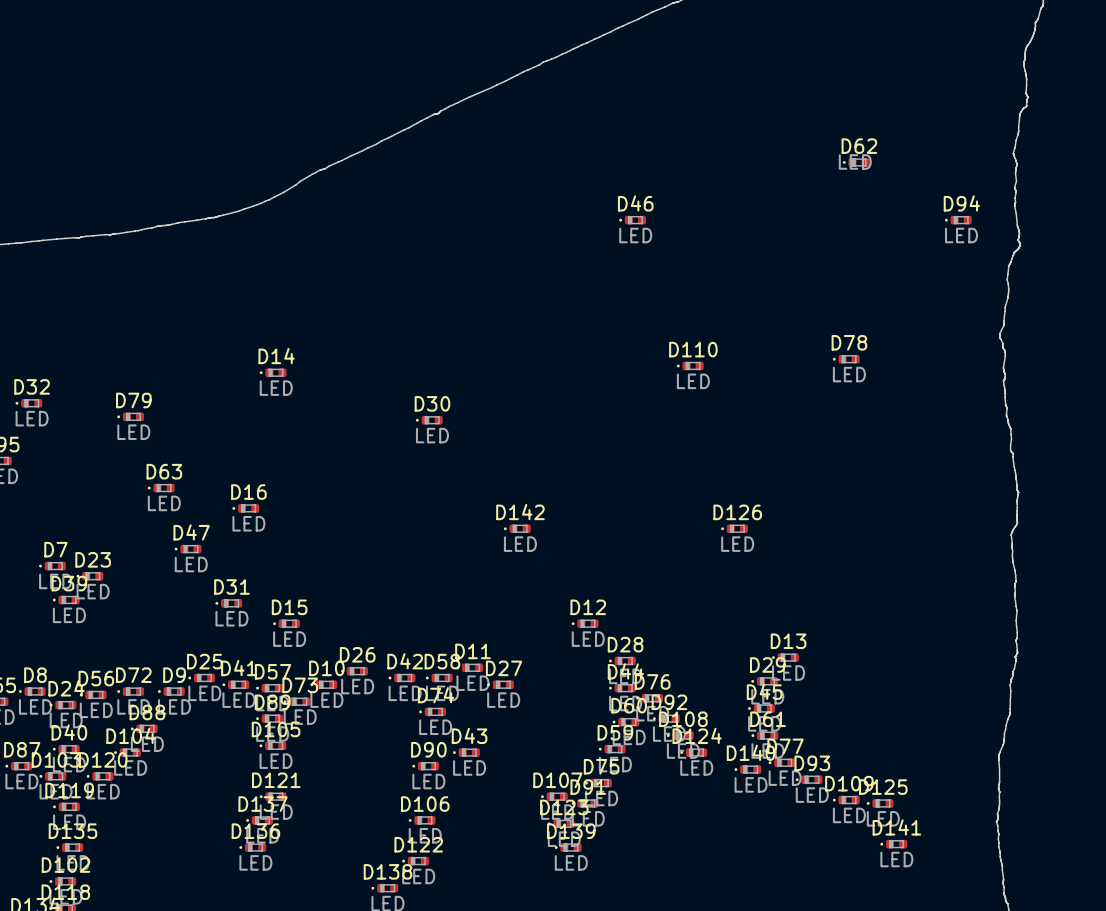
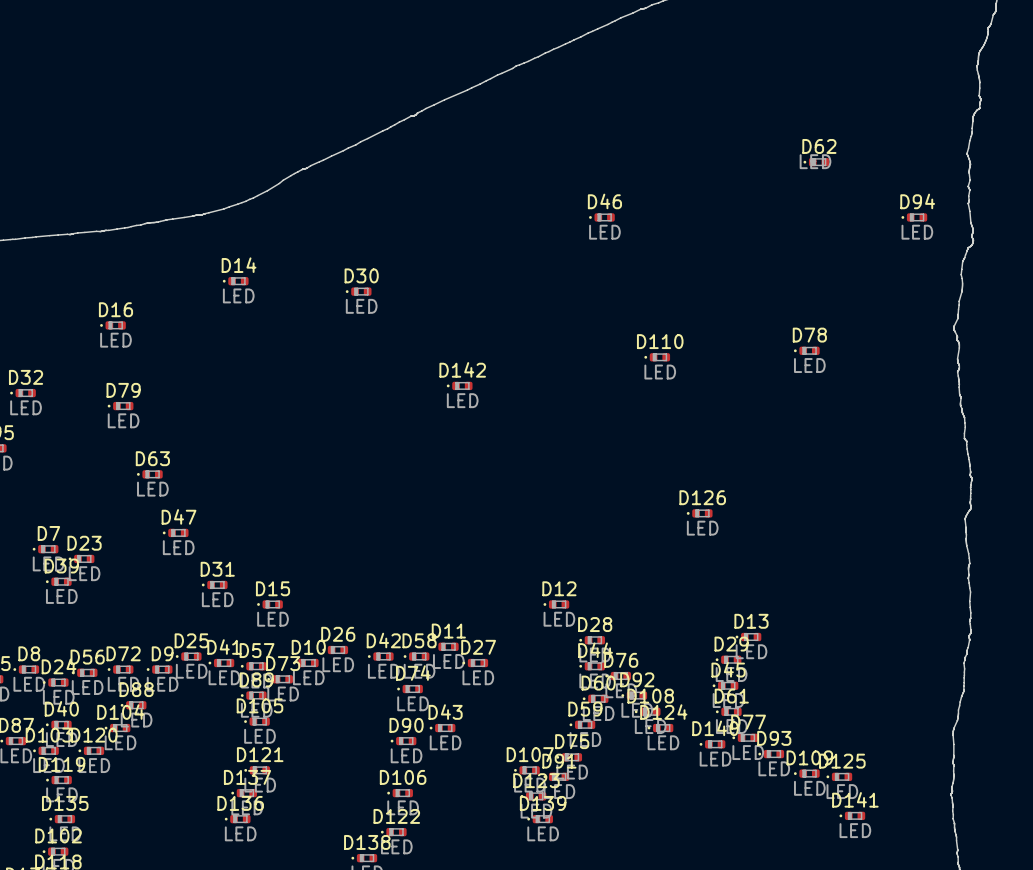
D14 position: (273, 372) -> (235, 281)
D30 position: (429, 420) -> (358, 291)
D16 position: (245, 508) -> (113, 325)
D142 position: (517, 528) -> (459, 385)

